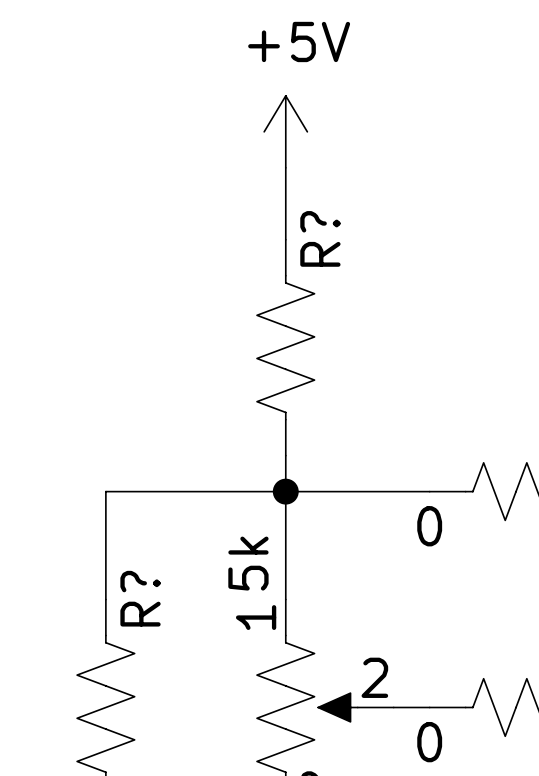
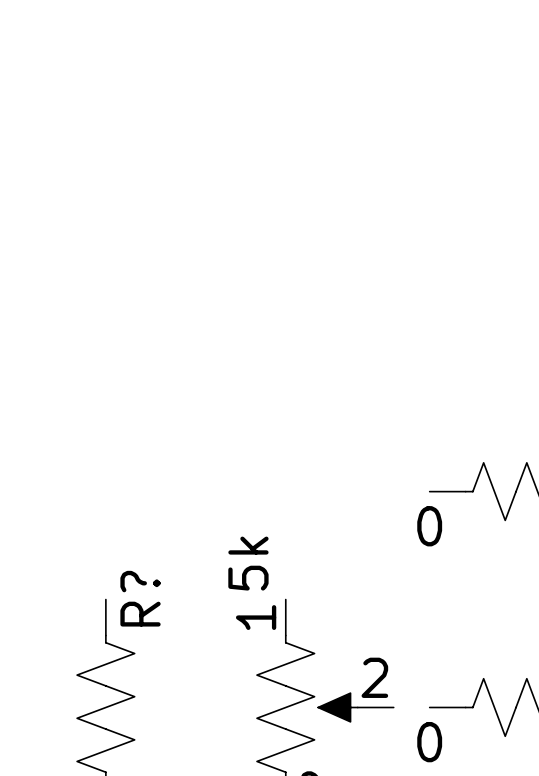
power symbol: +5V (285, 131) -> none
wire: (285, 167) (285, 239) -> none
R?: (285, 347) -> none
wire: (285, 455) (285, 599) -> none
junction: (285, 491) -> none
wire: (429, 491) (105, 491) (105, 599) -> none
wire: (393, 707) (429, 707) -> none

